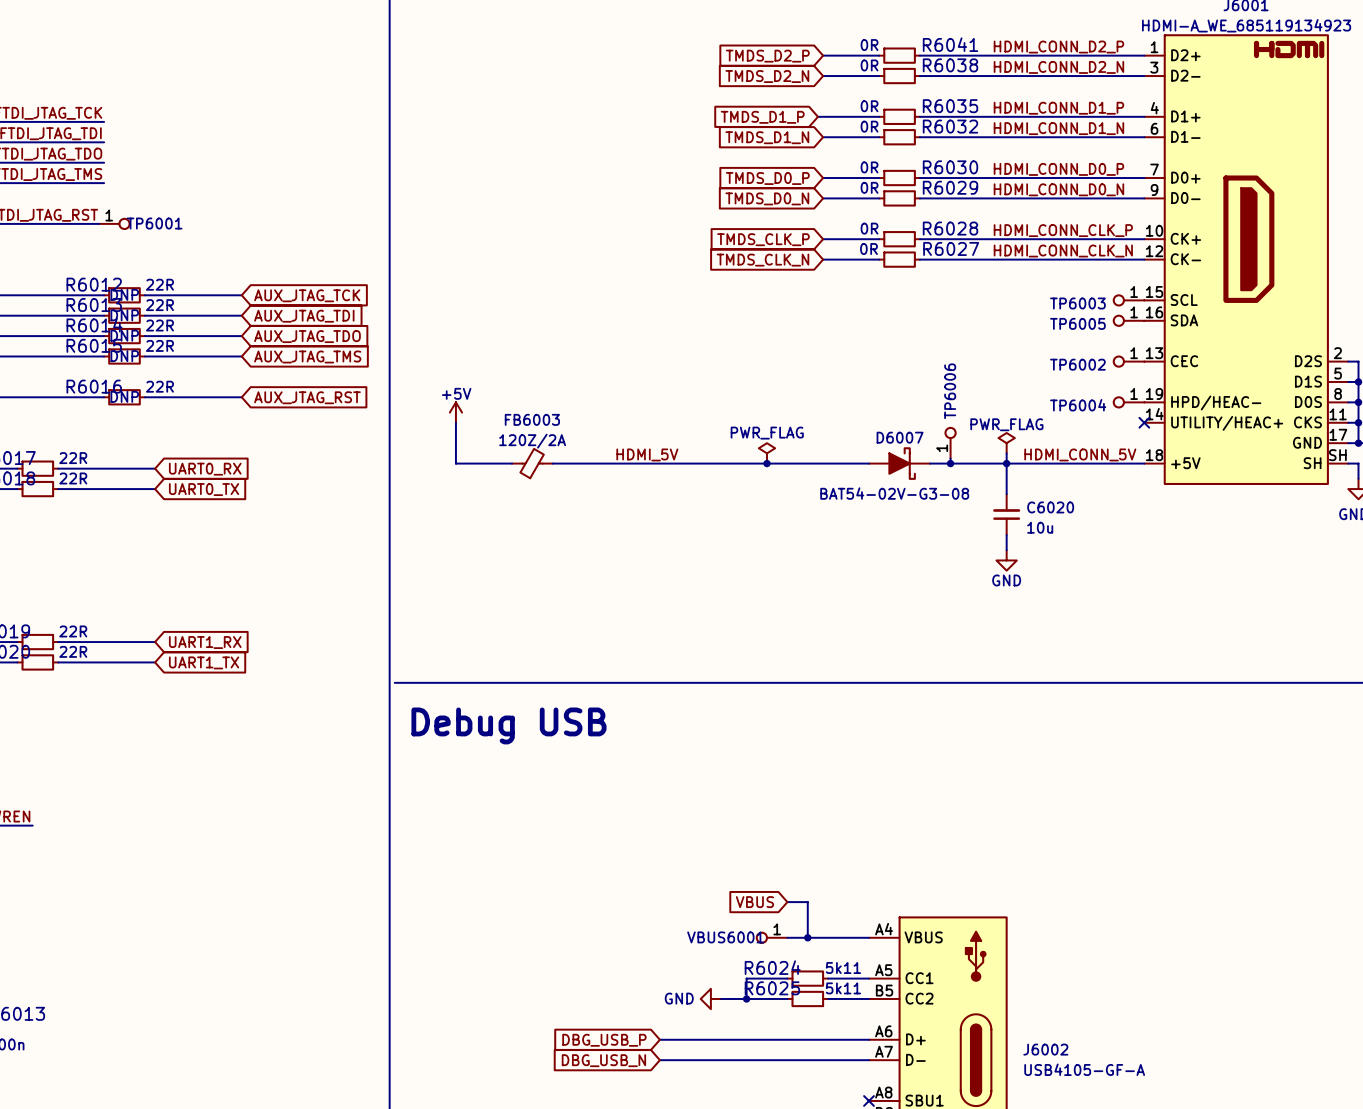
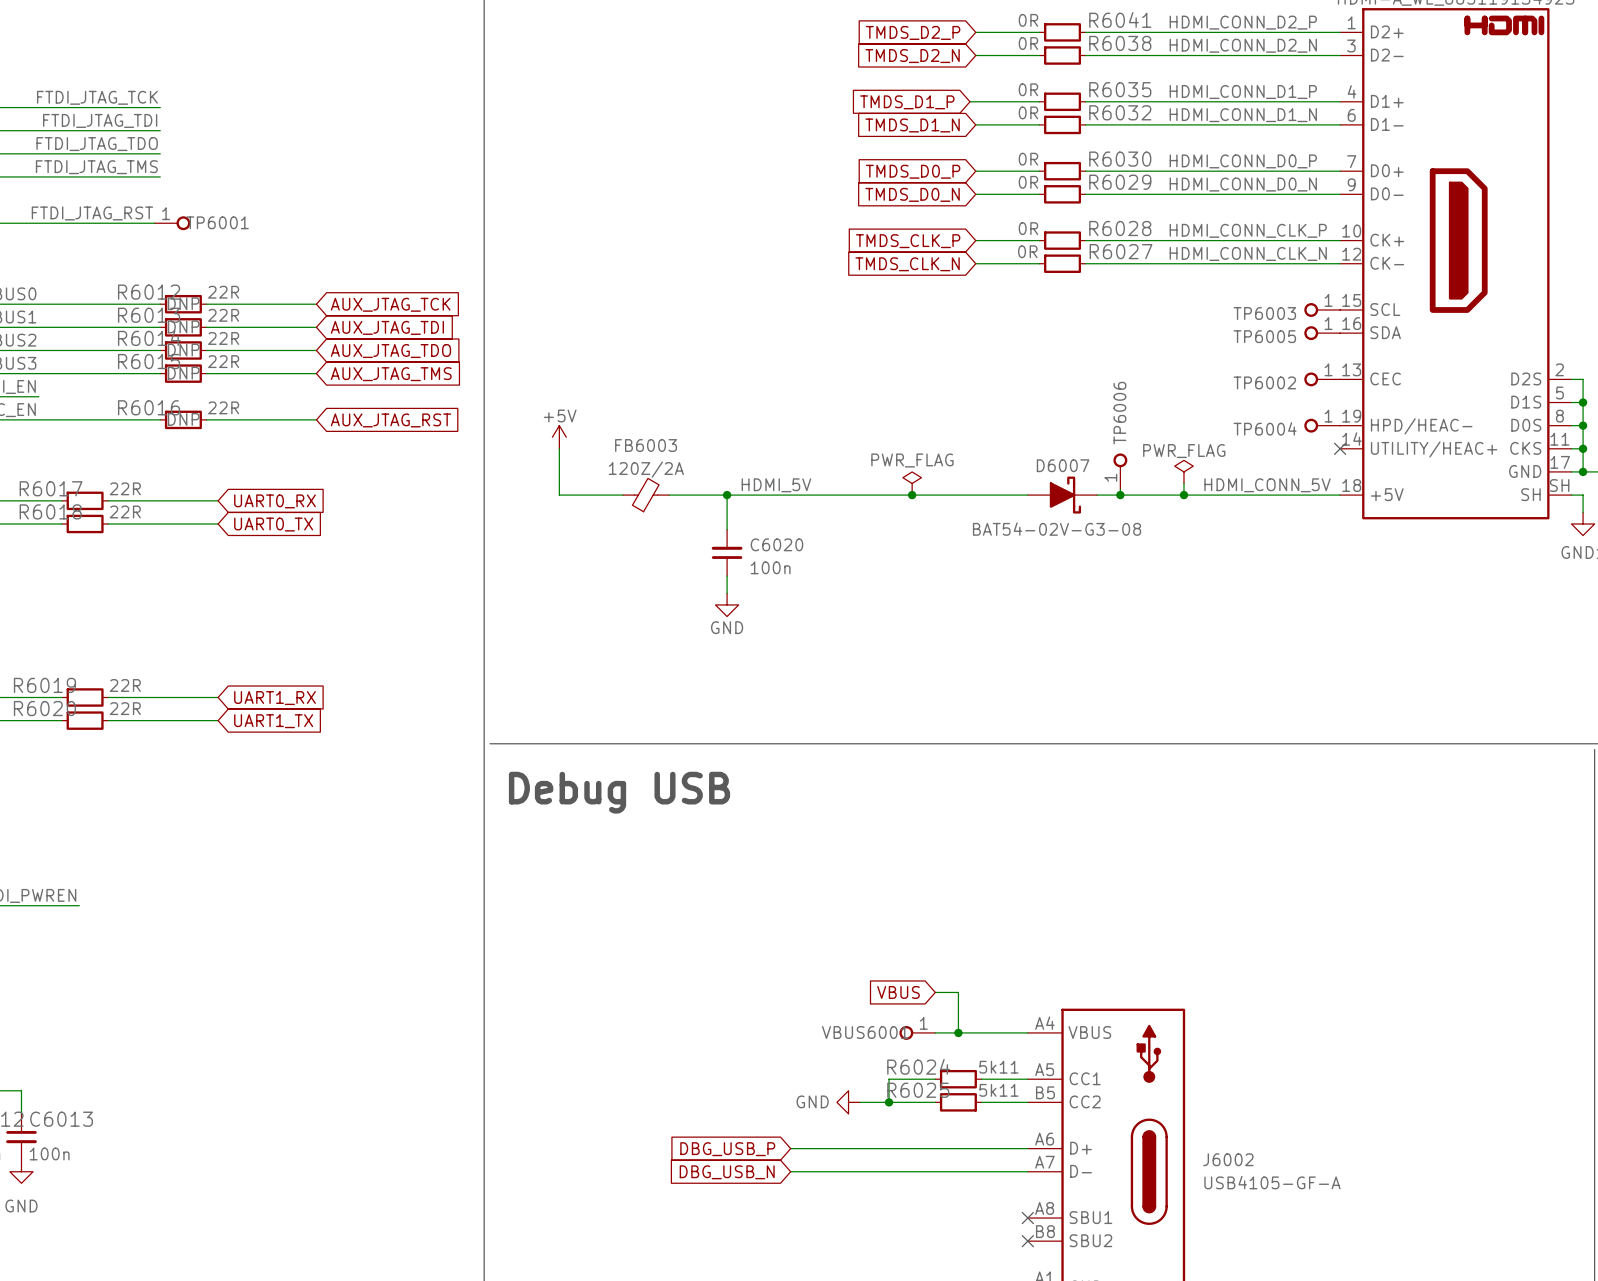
wire: none -> (727, 495) (727, 529)
junction: none -> (727, 495)
wire: (1006, 463) (1006, 494) -> none
C6020 position: (1006, 514) -> (727, 552)
C6020 text: 10u (1040, 527) -> 100n (770, 567)
wire: none -> (727, 576) (727, 593)
wire: (1006, 534) (1006, 550) -> none
power symbol: none -> GND (727, 604)
power symbol: GND (1006, 560) -> none

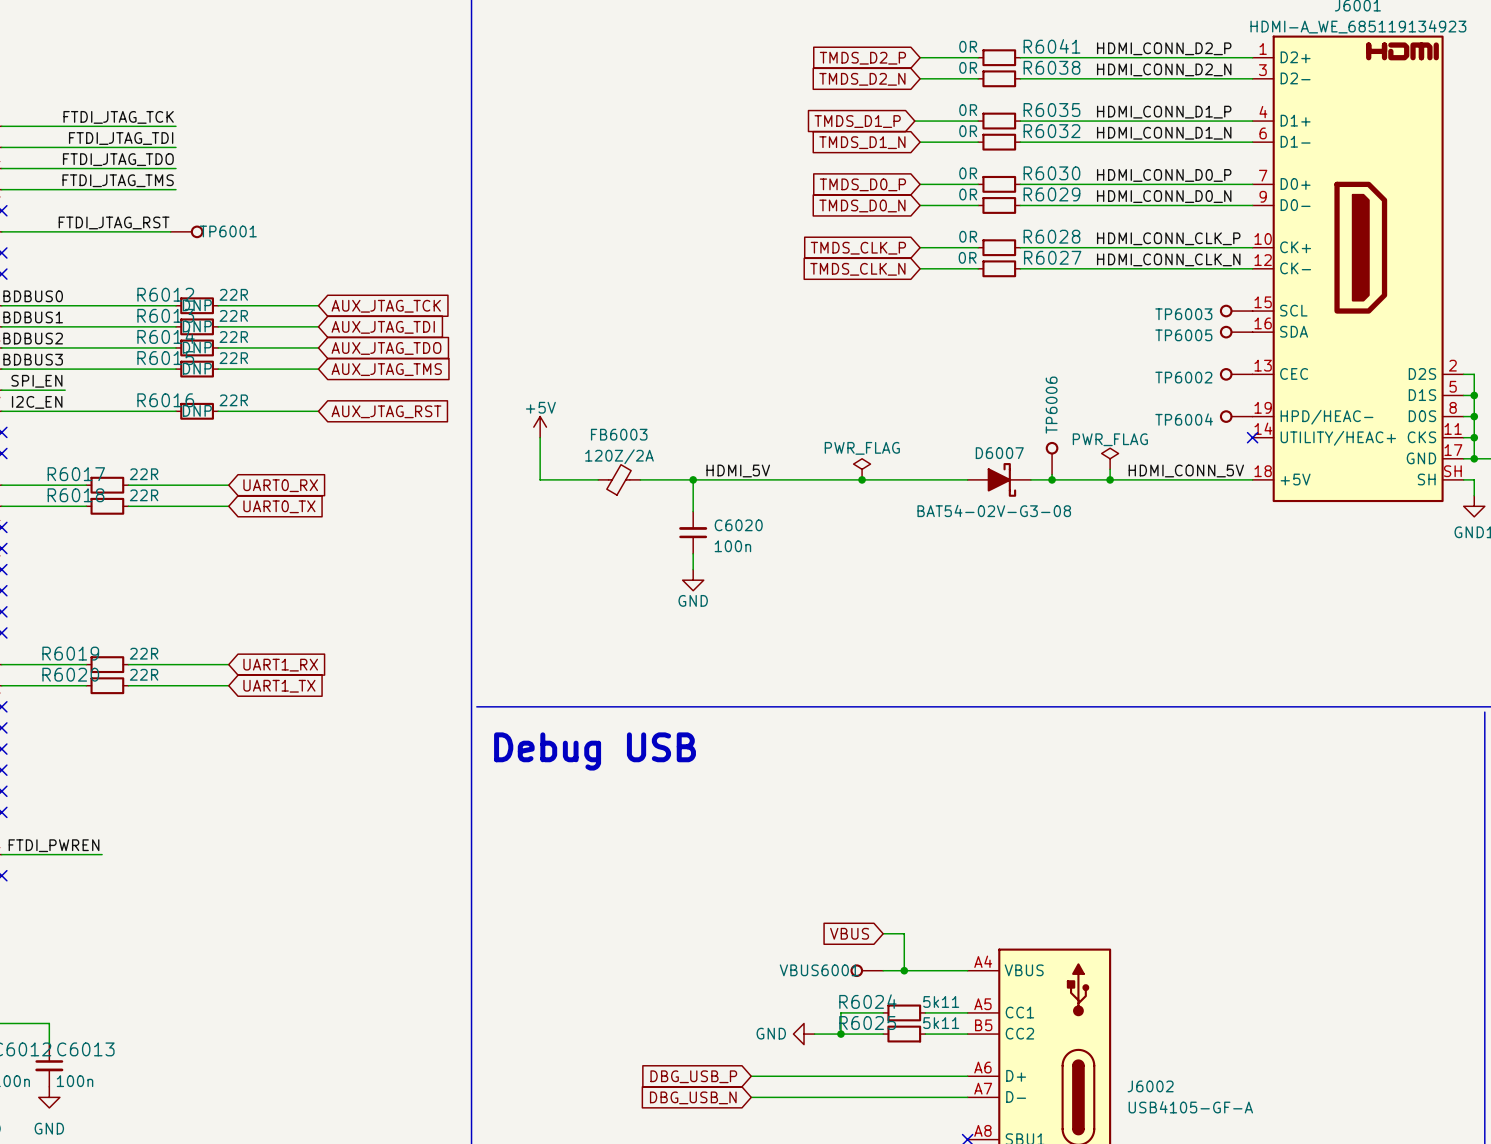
TP6001 pin number: 1 (166, 213) -> none
TP6003 pin number: 1 (1328, 300) -> none
TP6005 pin number: 1 (1328, 323) -> none
TP6002 pin number: 1 (1328, 369) -> none
TP6004 pin number: 1 (1328, 416) -> none
TP6006 pin number: 1 (1110, 477) -> none
VBUS6001 pin number: 1 (923, 1023) -> none

